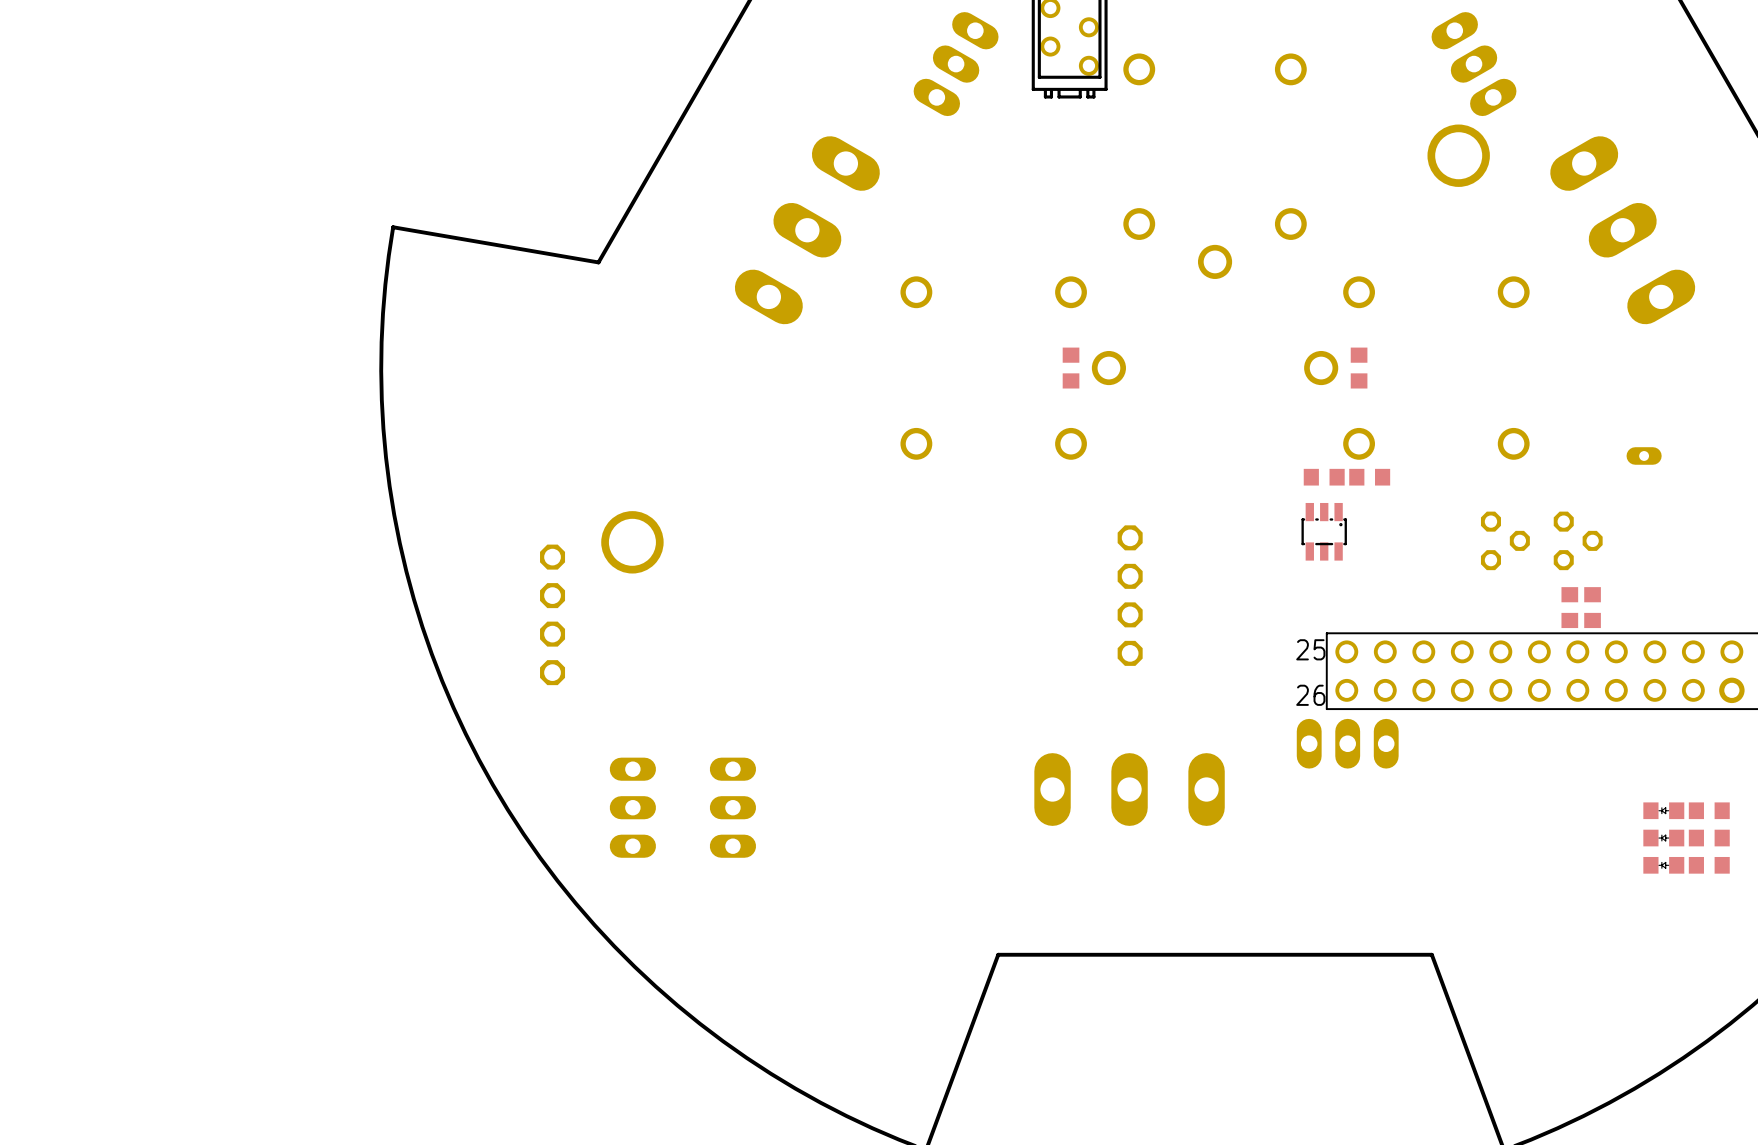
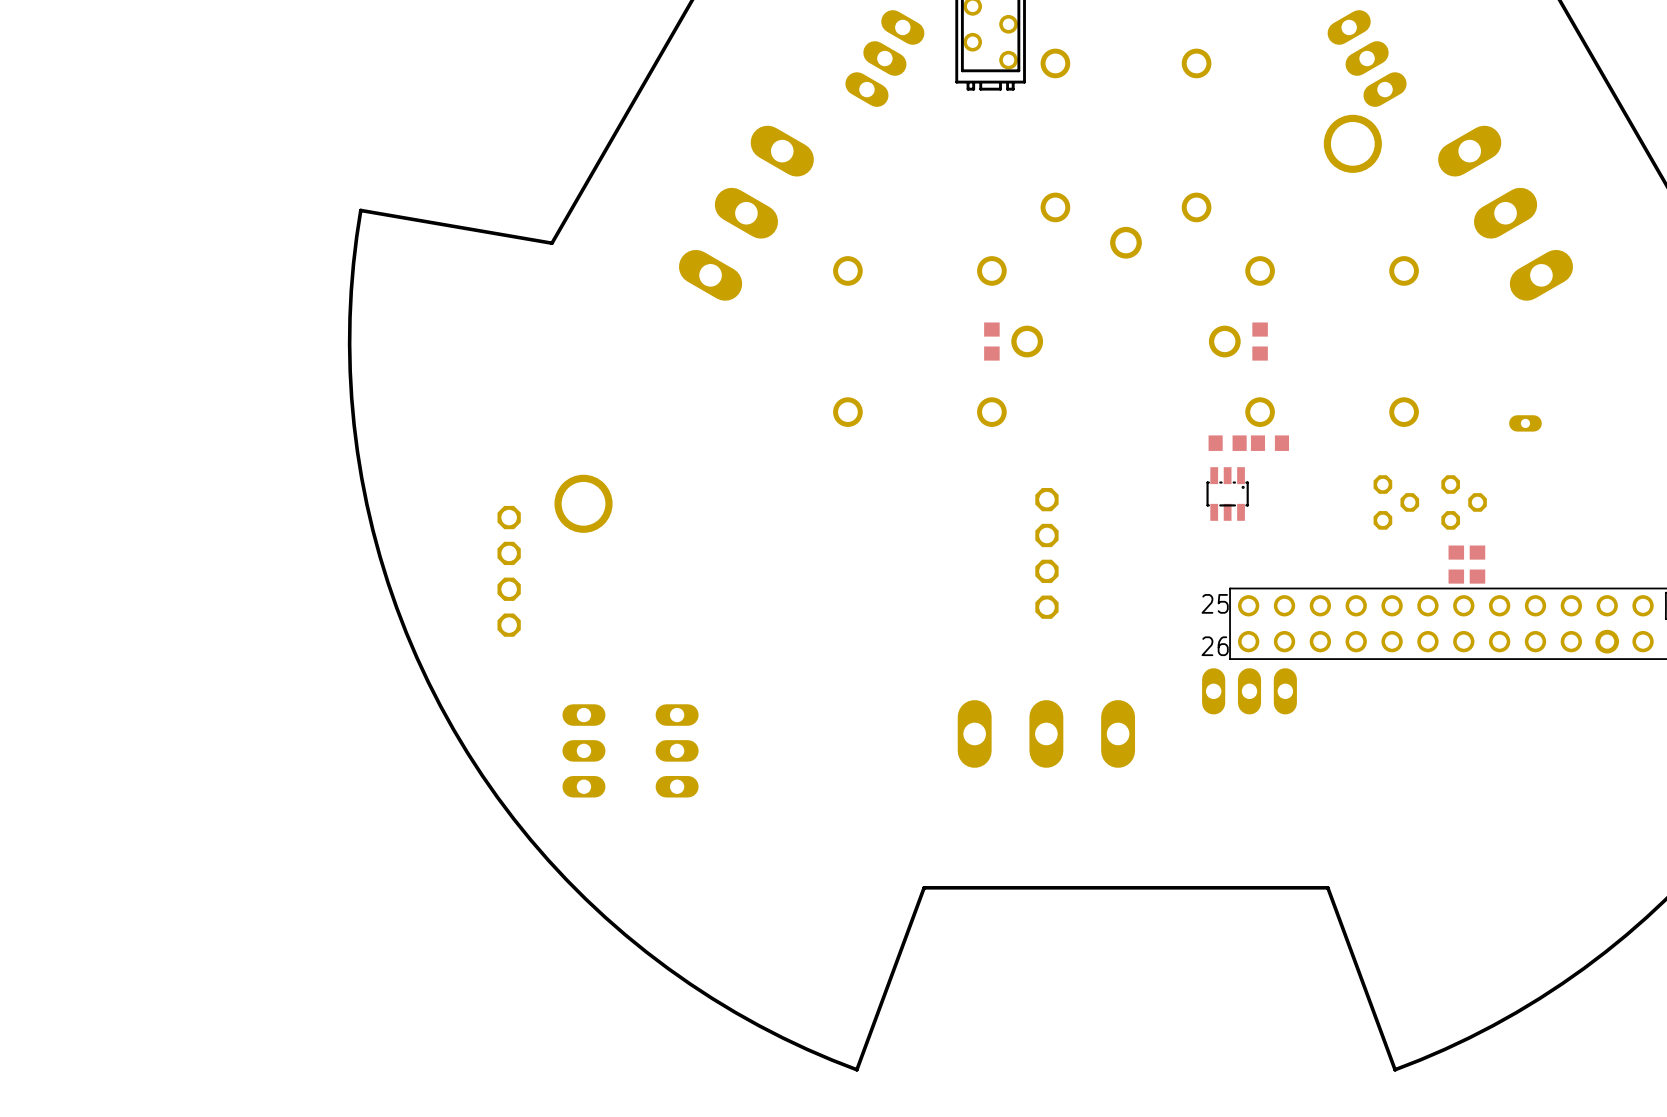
part: (1663, 810) -> none
part: (1709, 810) -> none
part: (1663, 838) -> none
part: (1709, 838) -> none
part: (1663, 865) -> none
part: (1709, 865) -> none

